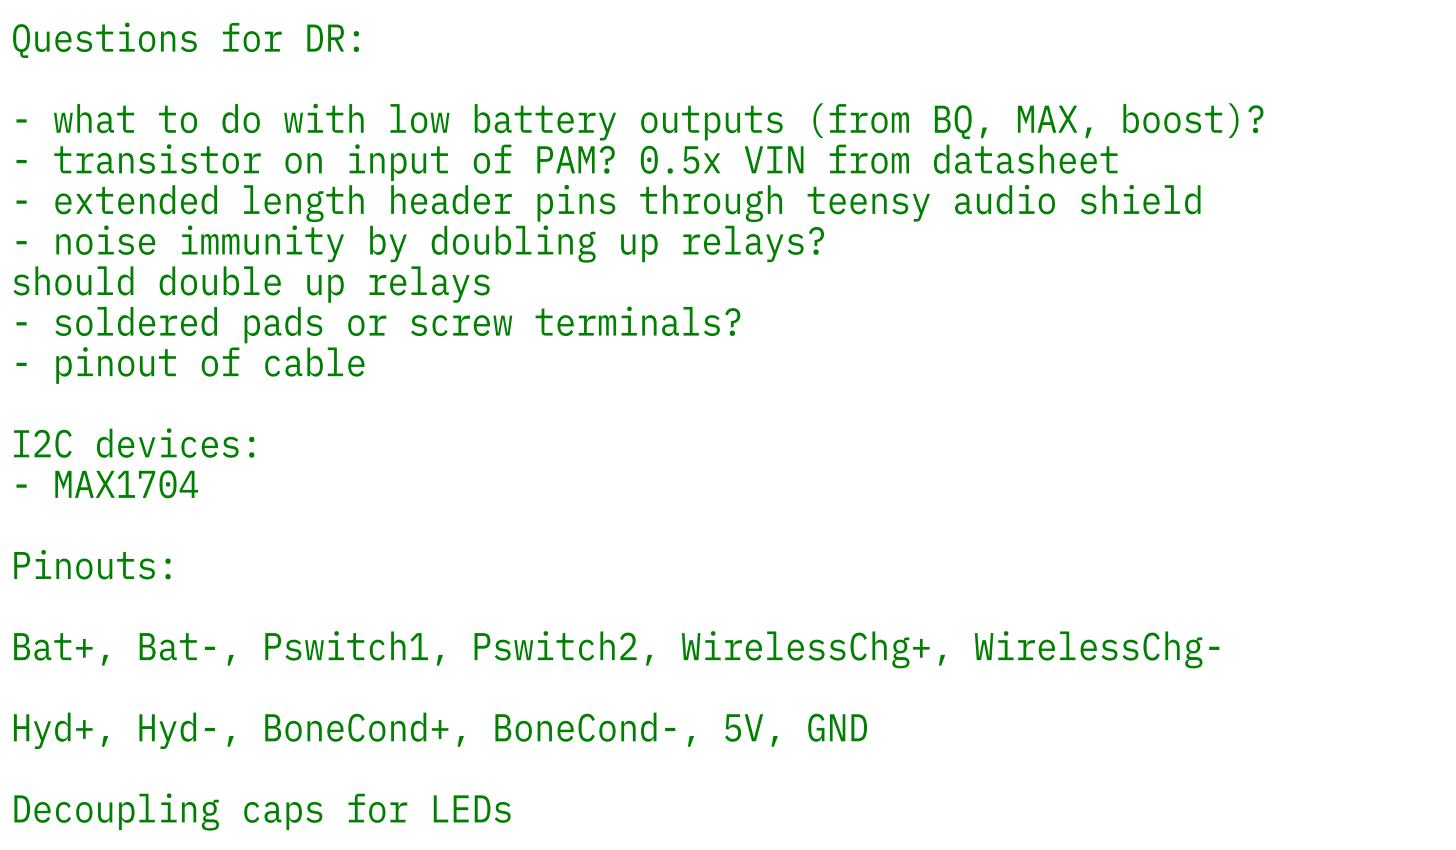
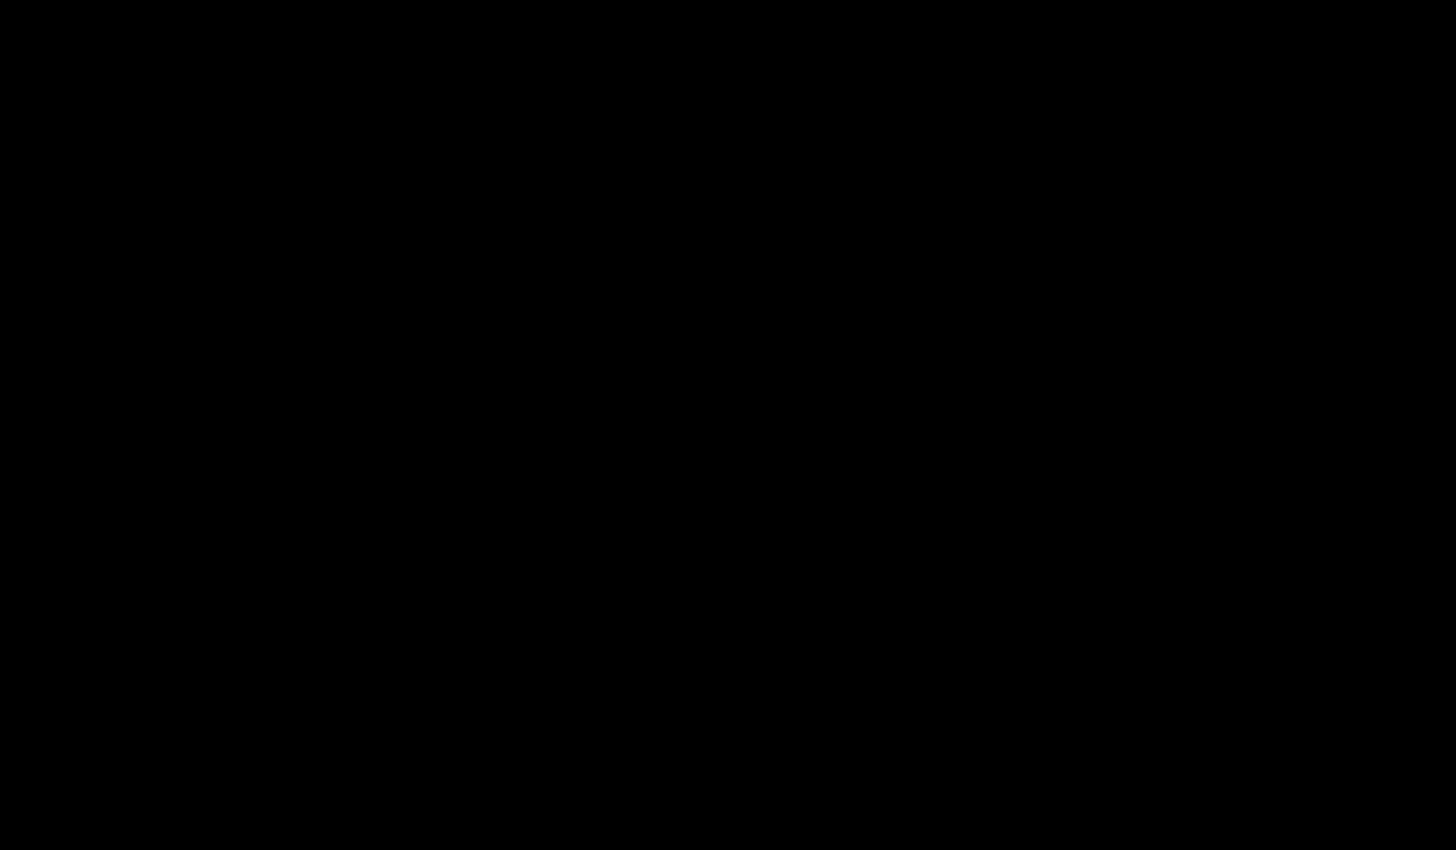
text: Questions for DR: (186, 40) -> none
text: - what to do with low battery outputs (from BQ, MAX, boost)? (639, 121) -> none
text: - transistor on input of PAM? 0.5x VIN from datasheet (567, 162) -> none
text: - extended length header pins through teensy audio shield (608, 203) -> none
text: - noise immunity by doubling up relays? (420, 244) -> none
text: should double up relays (251, 284) -> none
text: - soldered pads or screw terminals? (378, 324) -> none
text: - pinout of cable (190, 365) -> none
text: I2C devices: (134, 443) -> none
text: - MAX1704 (107, 484) -> none
text: Pinouts: (92, 564) -> none
text: Bat+, Bat-, Pswitch1, Pswitch2, WirelessChg+, WirelessChg- (616, 649) -> none
text: Hyd+, Hyd-, BoneCond+, BoneCond-, 5V, GND (440, 730) -> none
text: Decoupling caps for LEDs (262, 812) -> none

